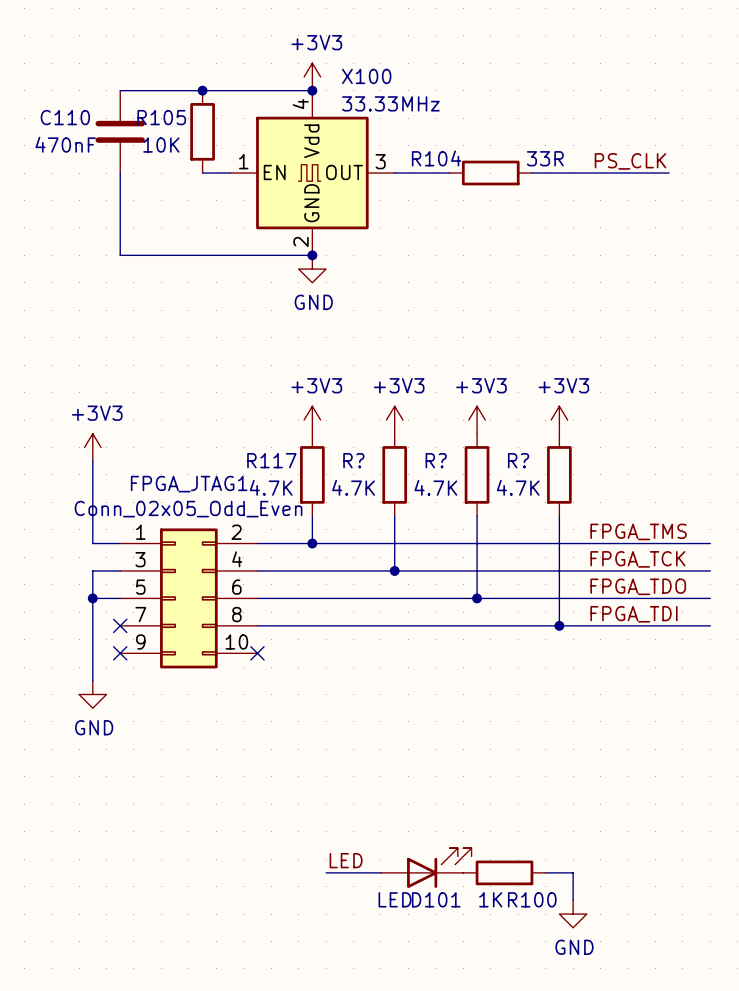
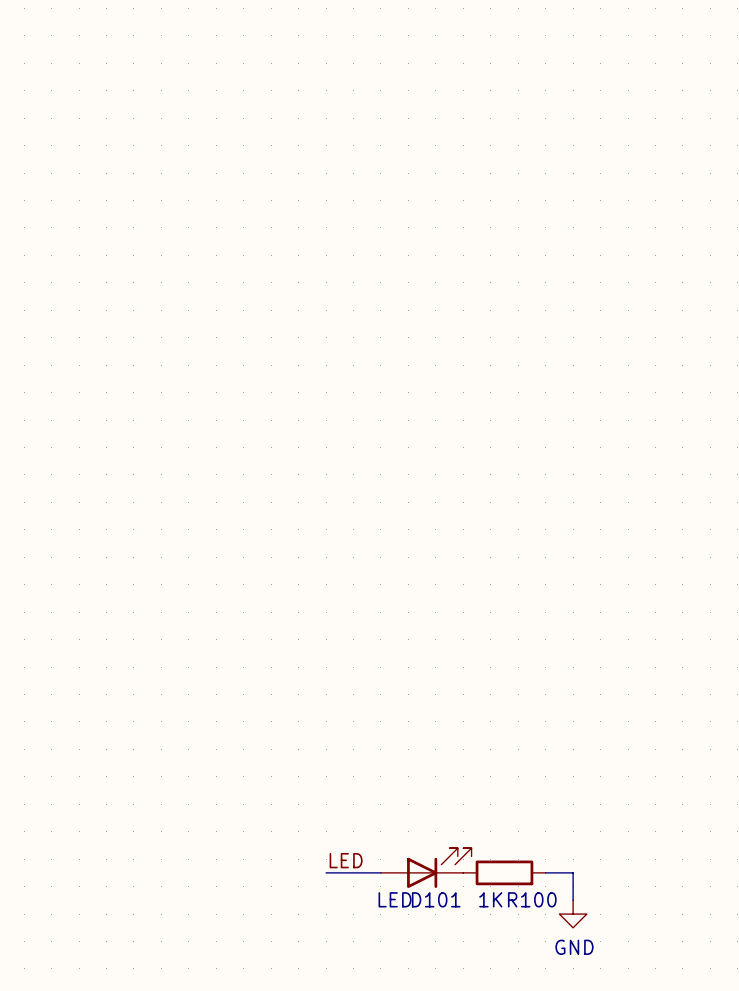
power symbol: +3V3 (312, 76) -> none
wire: (120, 90) (312, 90) -> none
junction: (202, 90) -> none
junction: (312, 90) -> none
C110: 470nF (120, 131) -> none
R105: 10K (202, 131) -> none
label: PS_CLK (630, 161) -> none
wire: (120, 173) (120, 255) (312, 255) -> none
wire: (202, 173) (230, 173) -> none
X100: 33.33MHz (312, 173) -> none
wire: (394, 173) (449, 173) -> none
R104: 33R (490, 173) -> none
wire: (531, 173) (669, 173) -> none
junction: (312, 255) -> none
power symbol: GND (312, 269) -> none
power symbol: +3V3 (312, 420) -> none
power symbol: +3V3 (394, 420) -> none
power symbol: +3V3 (477, 420) -> none
power symbol: +3V3 (559, 420) -> none
power symbol: +3V3 (92, 447) -> none
wire: (92, 461) (92, 543) (120, 543) -> none
R117: 4.7K (312, 474) -> none
R?: 4.7K (394, 474) -> none
R?: 4.7K (477, 474) -> none
R?: 4.7K (559, 474) -> none
wire: (312, 516) (312, 543) -> none
wire: (394, 516) (394, 570) -> none
wire: (477, 516) (477, 598) -> none
wire: (559, 516) (559, 625) -> none
label: FPGA_TMS (638, 531) -> none
wire: (257, 543) (710, 543) -> none
junction: (312, 543) -> none
label: FPGA_TCK (637, 559) -> none
wire: (120, 570) (92, 570) (92, 680) -> none
wire: (257, 570) (710, 570) -> none
junction: (394, 570) -> none
label: FPGA_TDO (638, 586) -> none
wire: (92, 598) (120, 598) -> none
junction: (92, 598) -> none
FPGA_JTAG1: Conn_02x05_Odd_Even (188, 598) -> none
wire: (257, 598) (710, 598) -> none
junction: (477, 598) -> none
label: FPGA_TDI (633, 614) -> none
no-connect mark: (120, 625) -> none
wire: (257, 625) (710, 625) -> none
junction: (559, 625) -> none
no-connect mark: (120, 653) -> none
no-connect mark: (257, 653) -> none
power symbol: GND (92, 694) -> none

